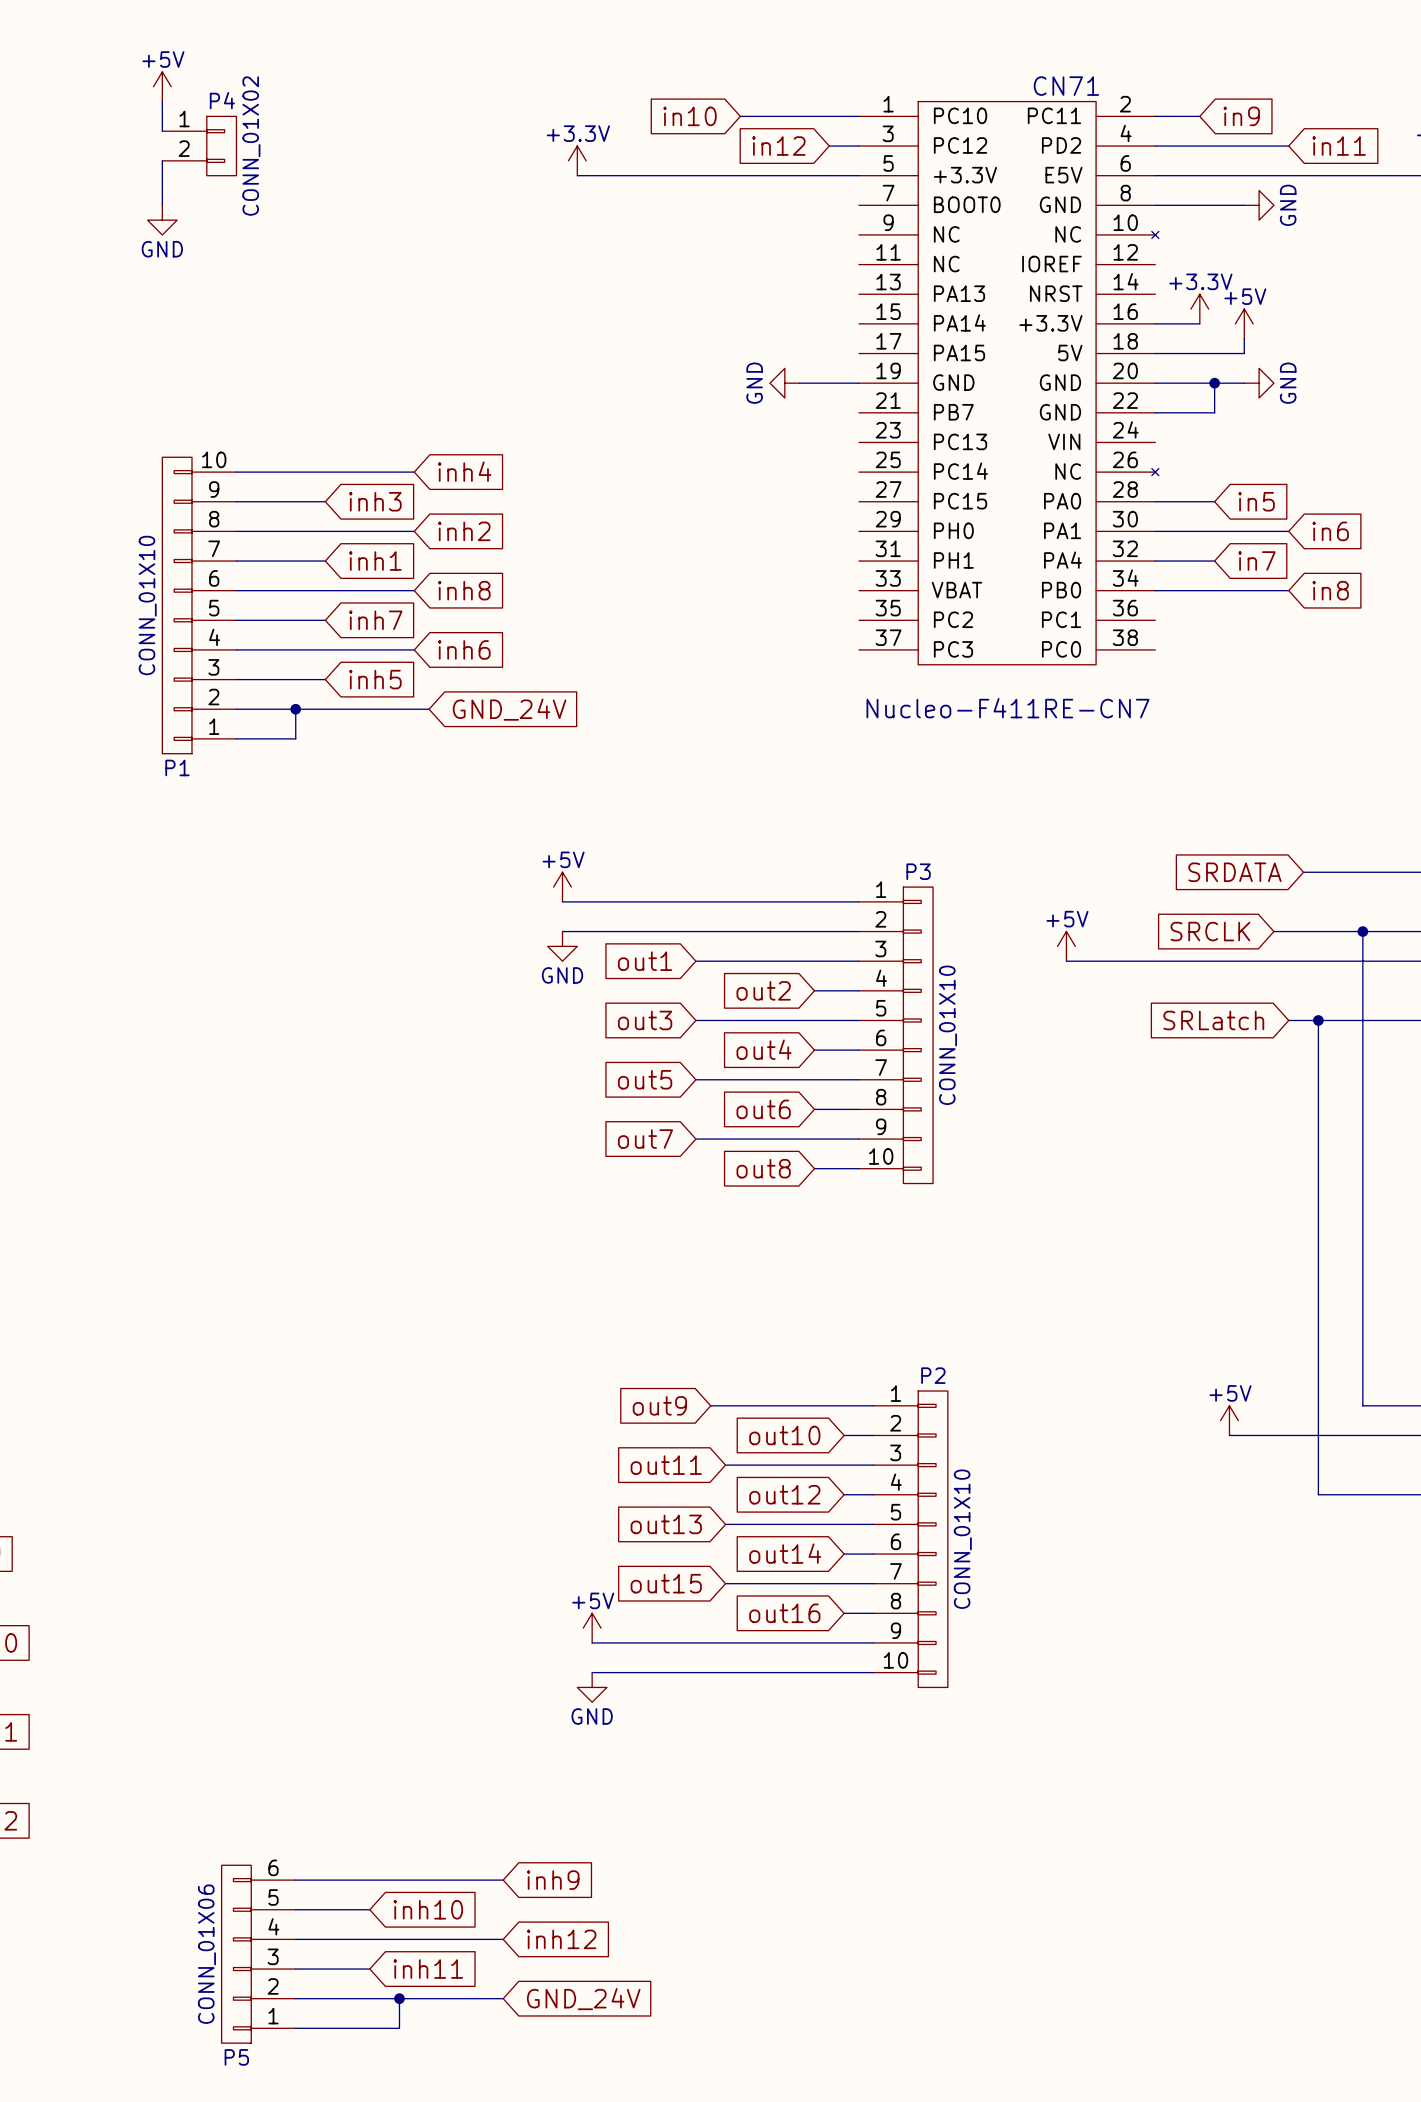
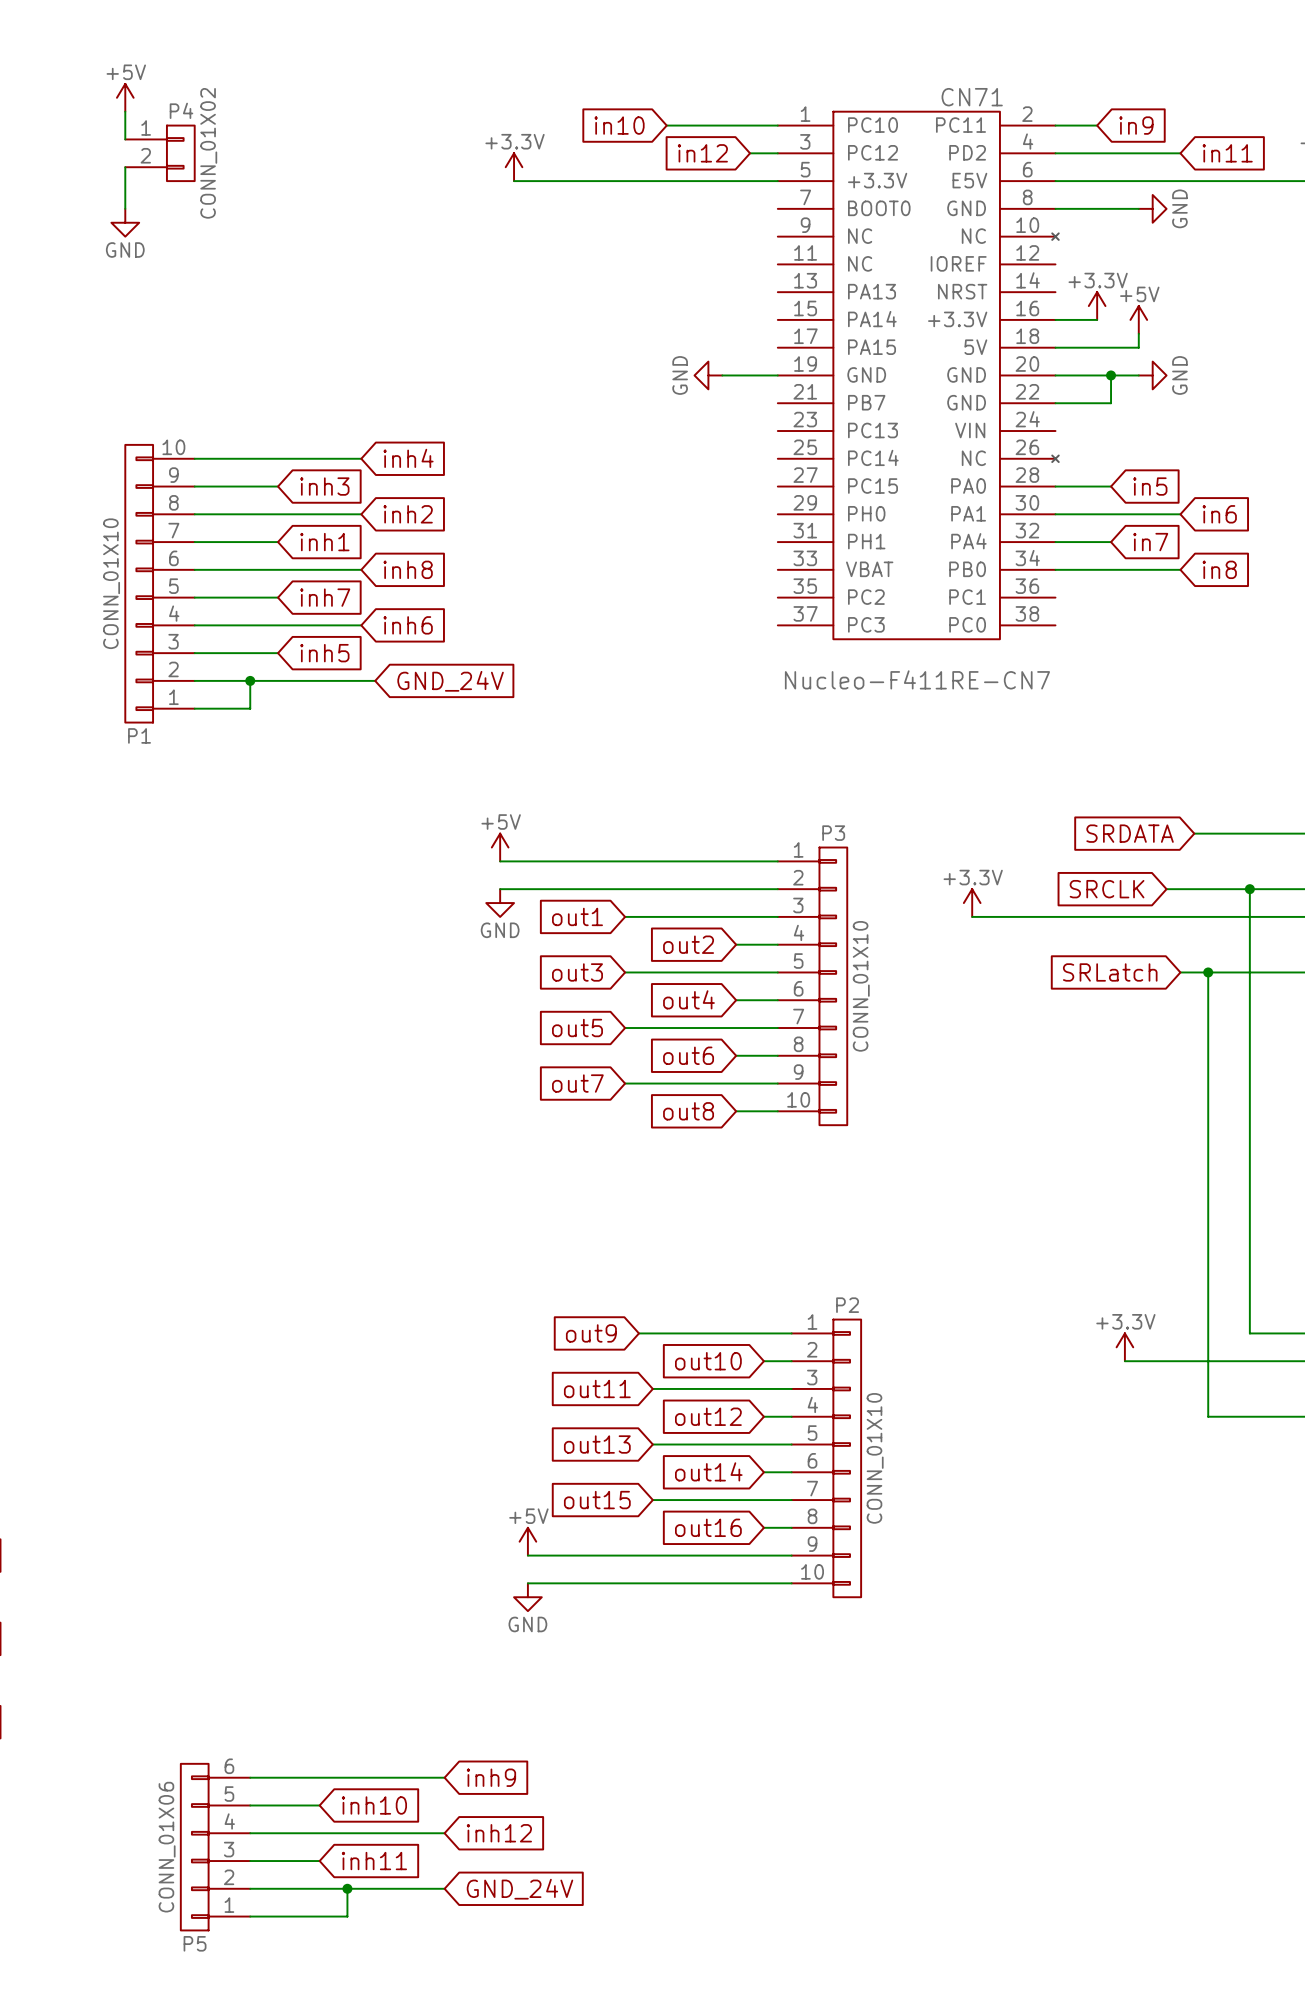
power symbol: +5V (1066, 946) -> +3.3V (972, 903)
power symbol: +5V (1229, 1420) -> +3.3V (1124, 1347)

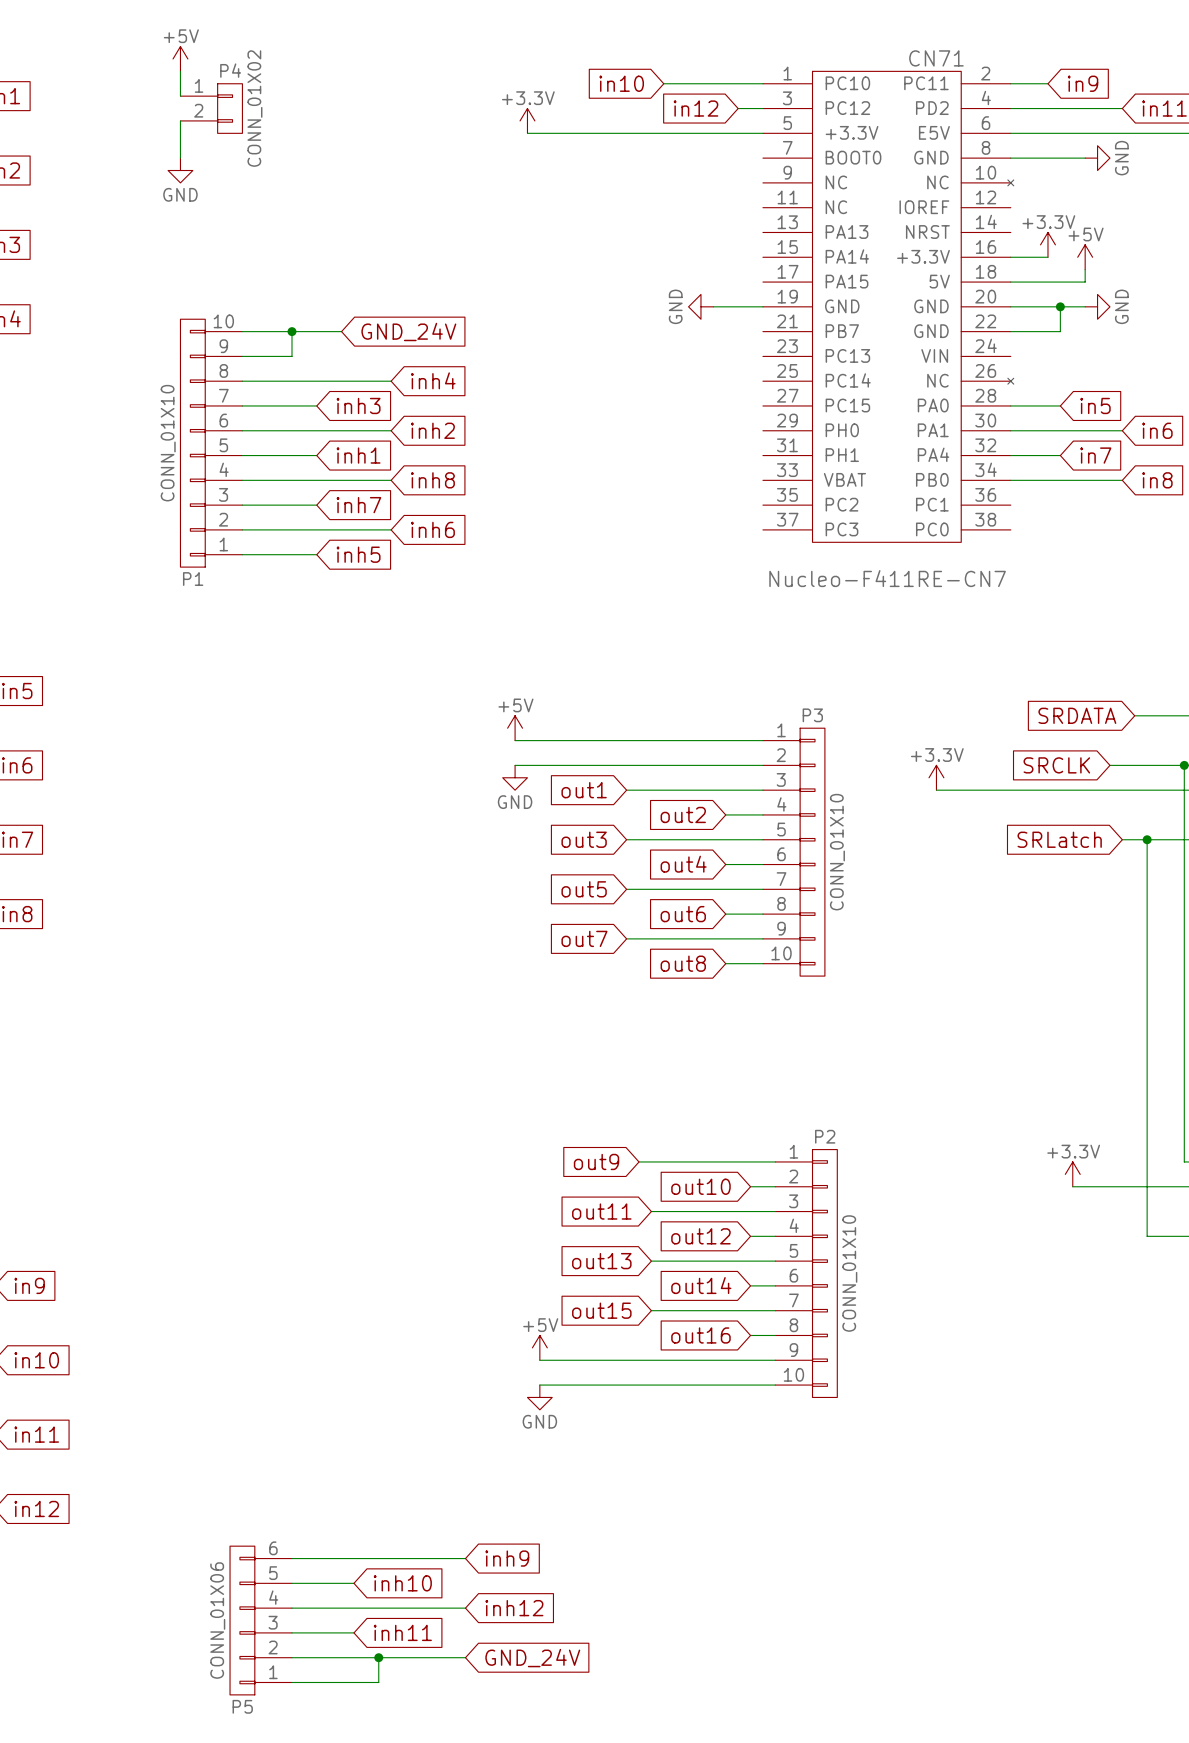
wire: none -> (242, 331) (341, 331)
wire: none -> (291, 331) (291, 356) (242, 356)
junction: none -> (291, 331)
global label: none -> GND_24V (408, 331)
P1 position: (160, 583) -> (211, 443)
wire: (194, 680) (375, 680) -> none
wire: (250, 680) (250, 708) (194, 708) -> none
junction: (250, 680) -> none
global label: GND_24V (450, 681) -> none

